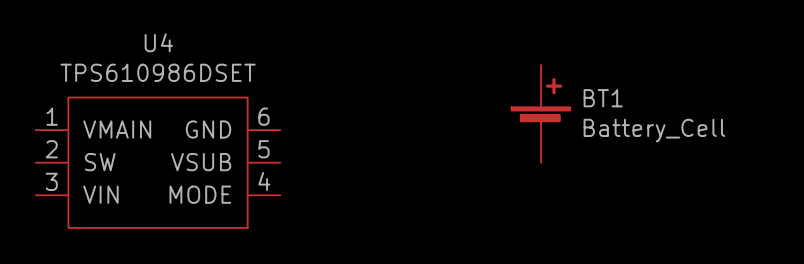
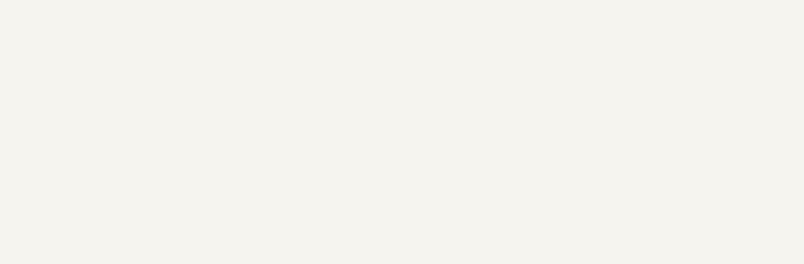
BT1: Battery_Cell (540, 113) -> none
U4: TPS610986DSET (158, 162) -> none

